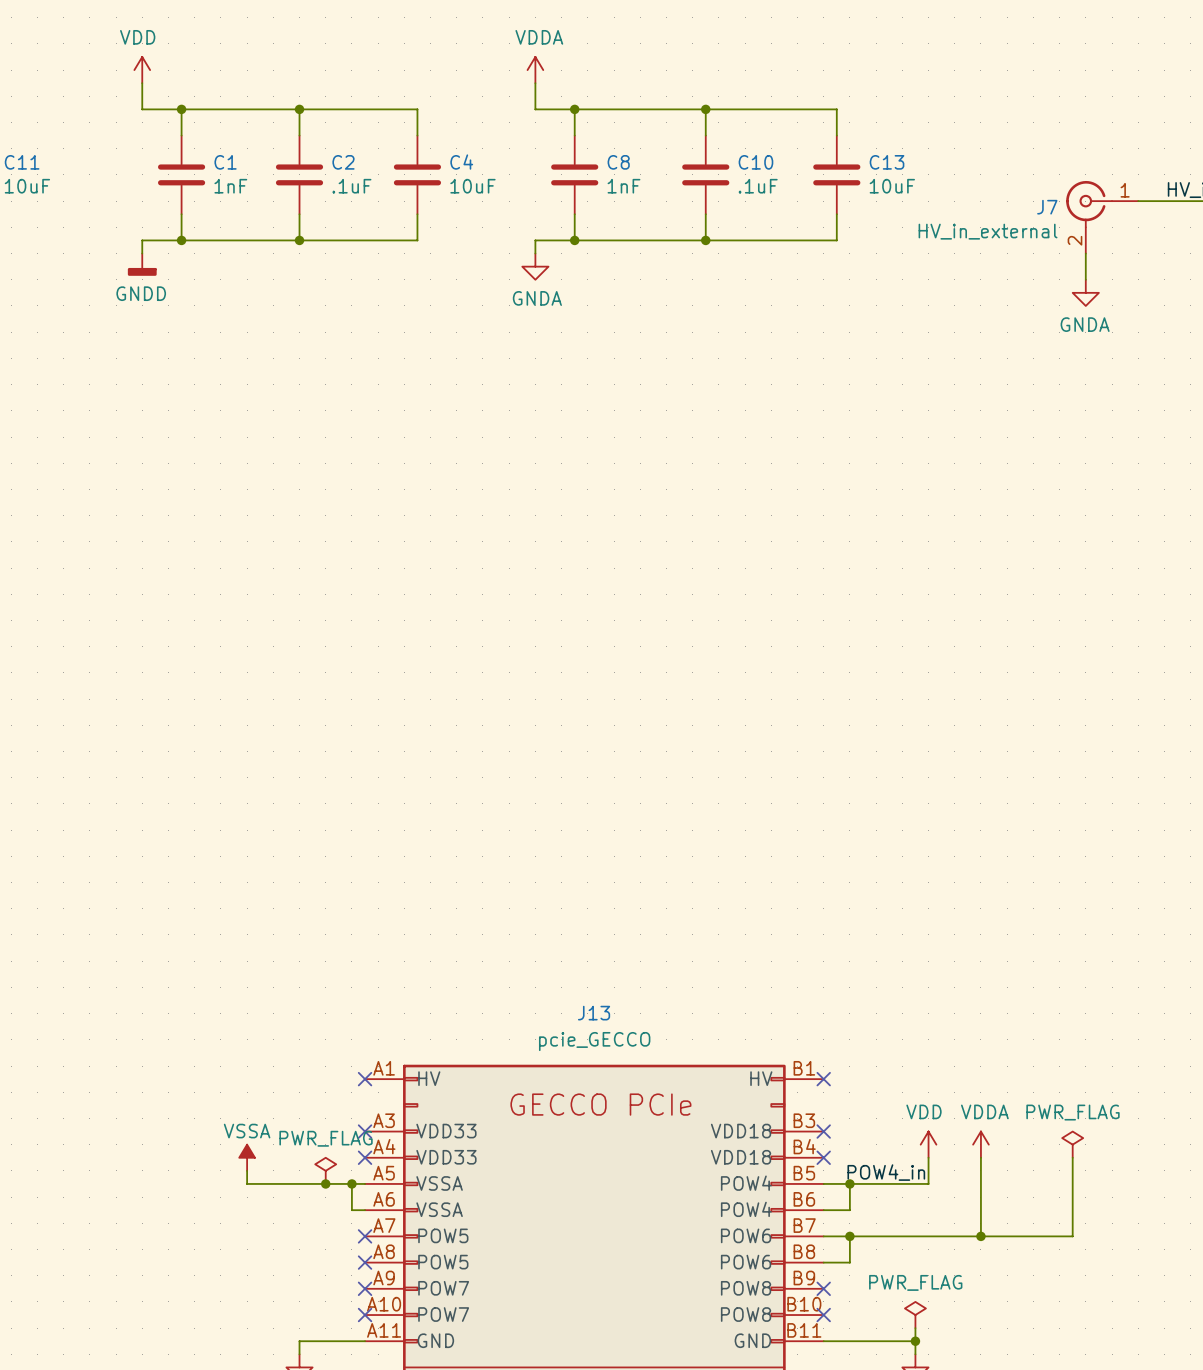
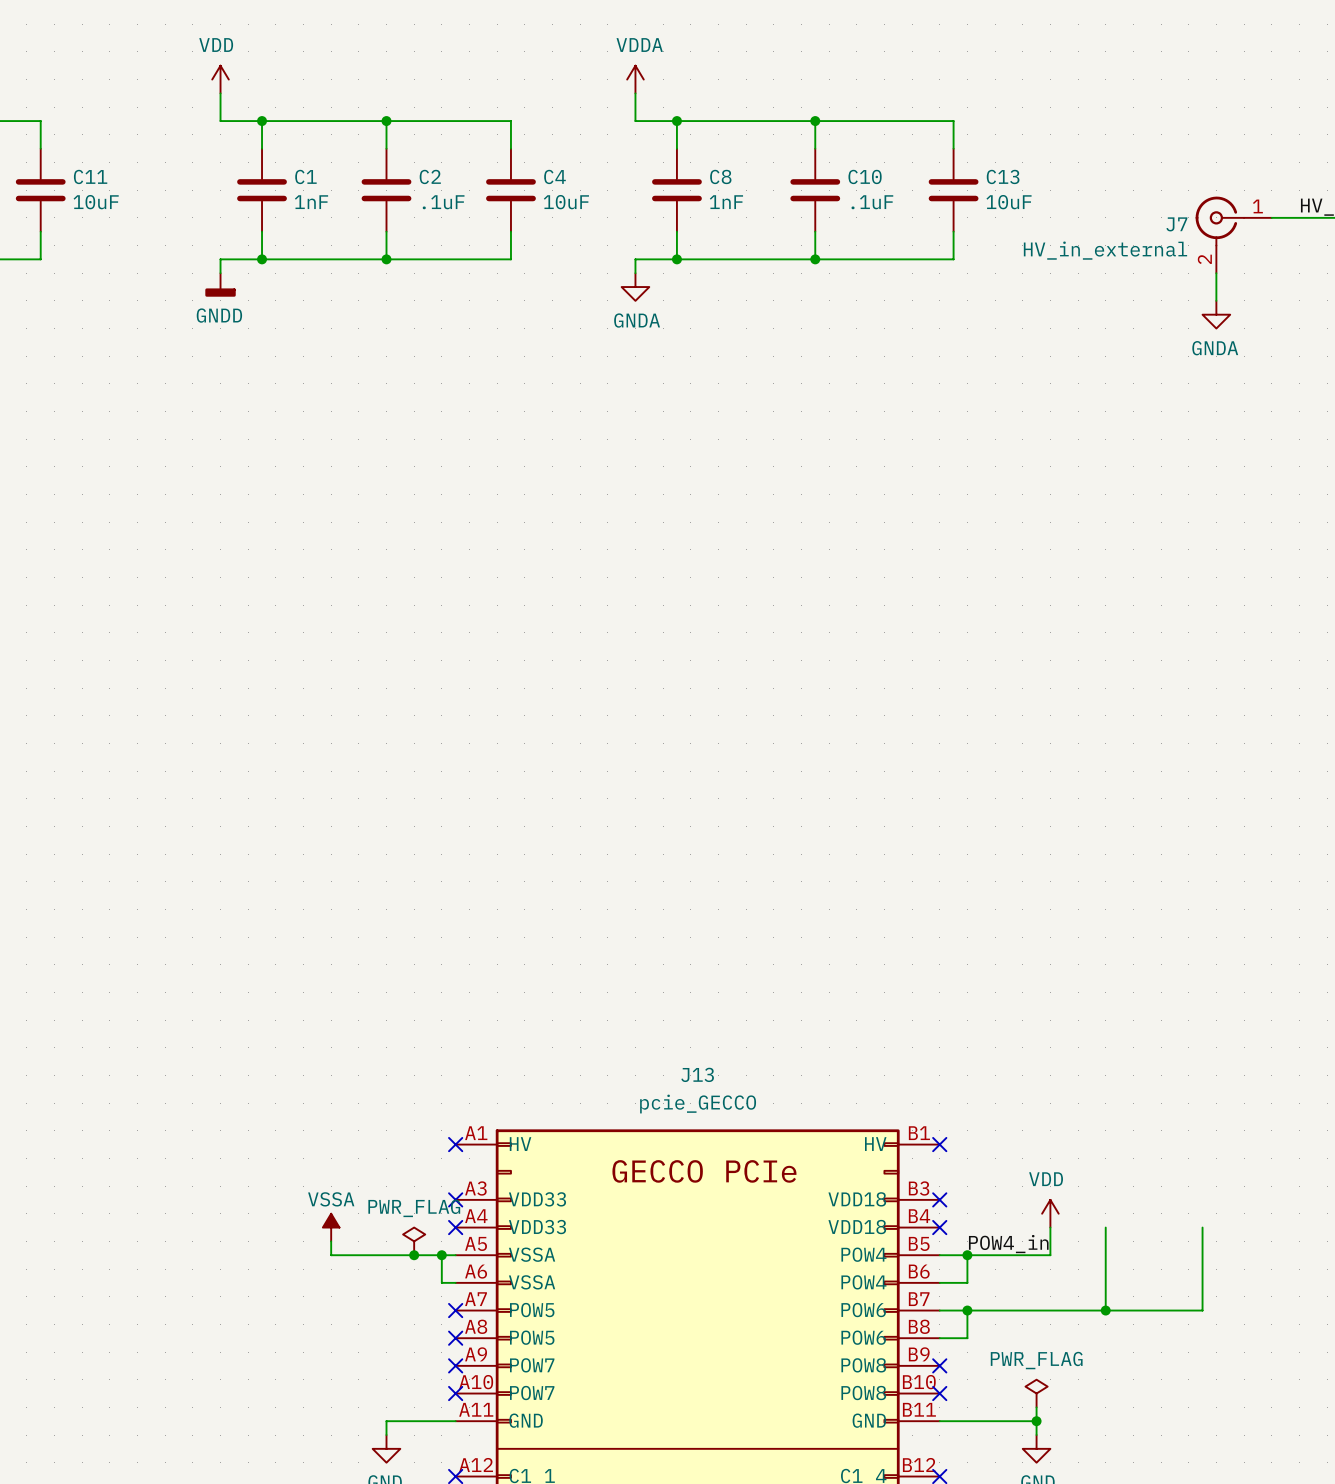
power symbol: VDDA (980, 1144) -> none
power symbol: PWR_FLAG (1072, 1144) -> none

